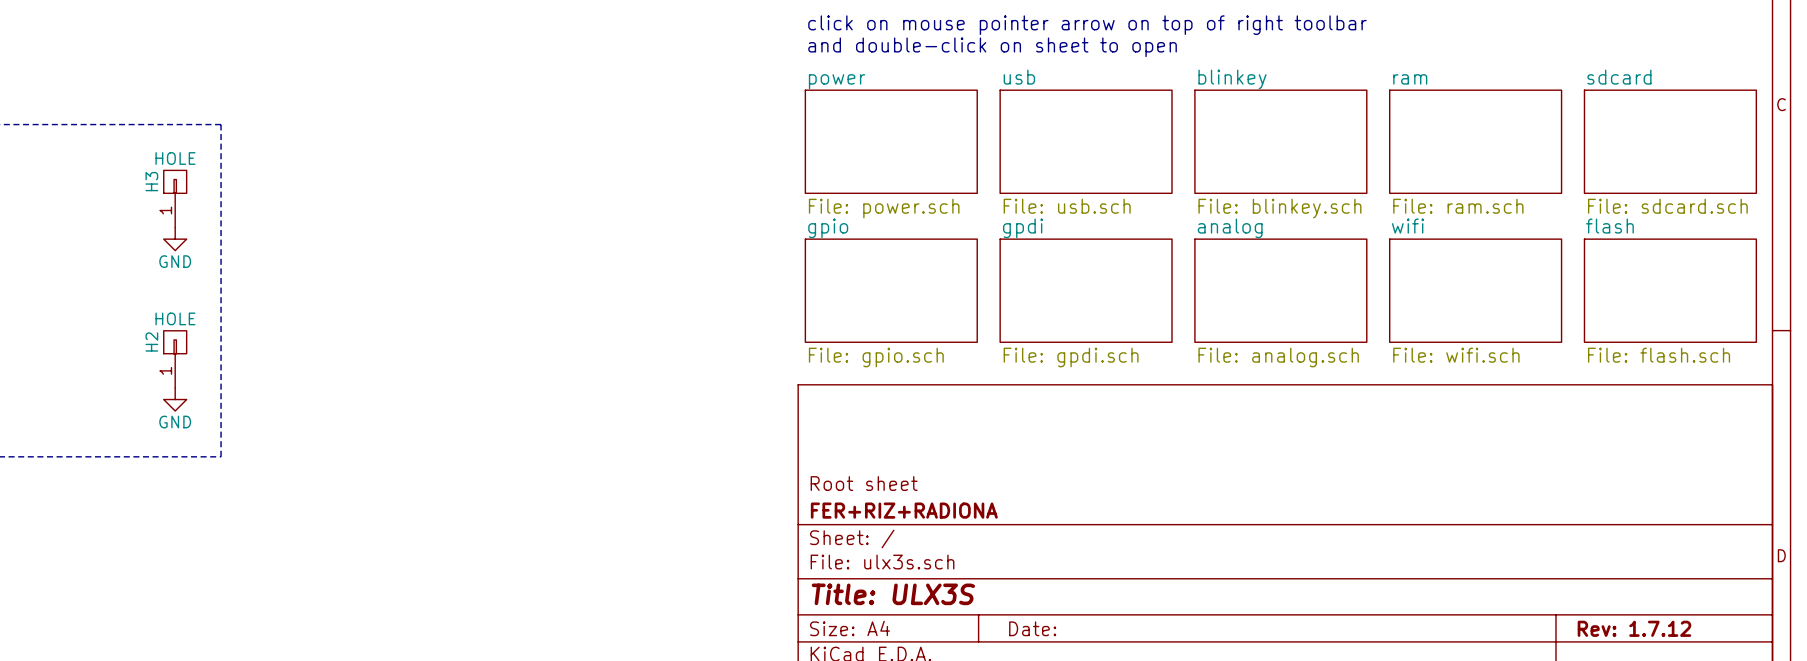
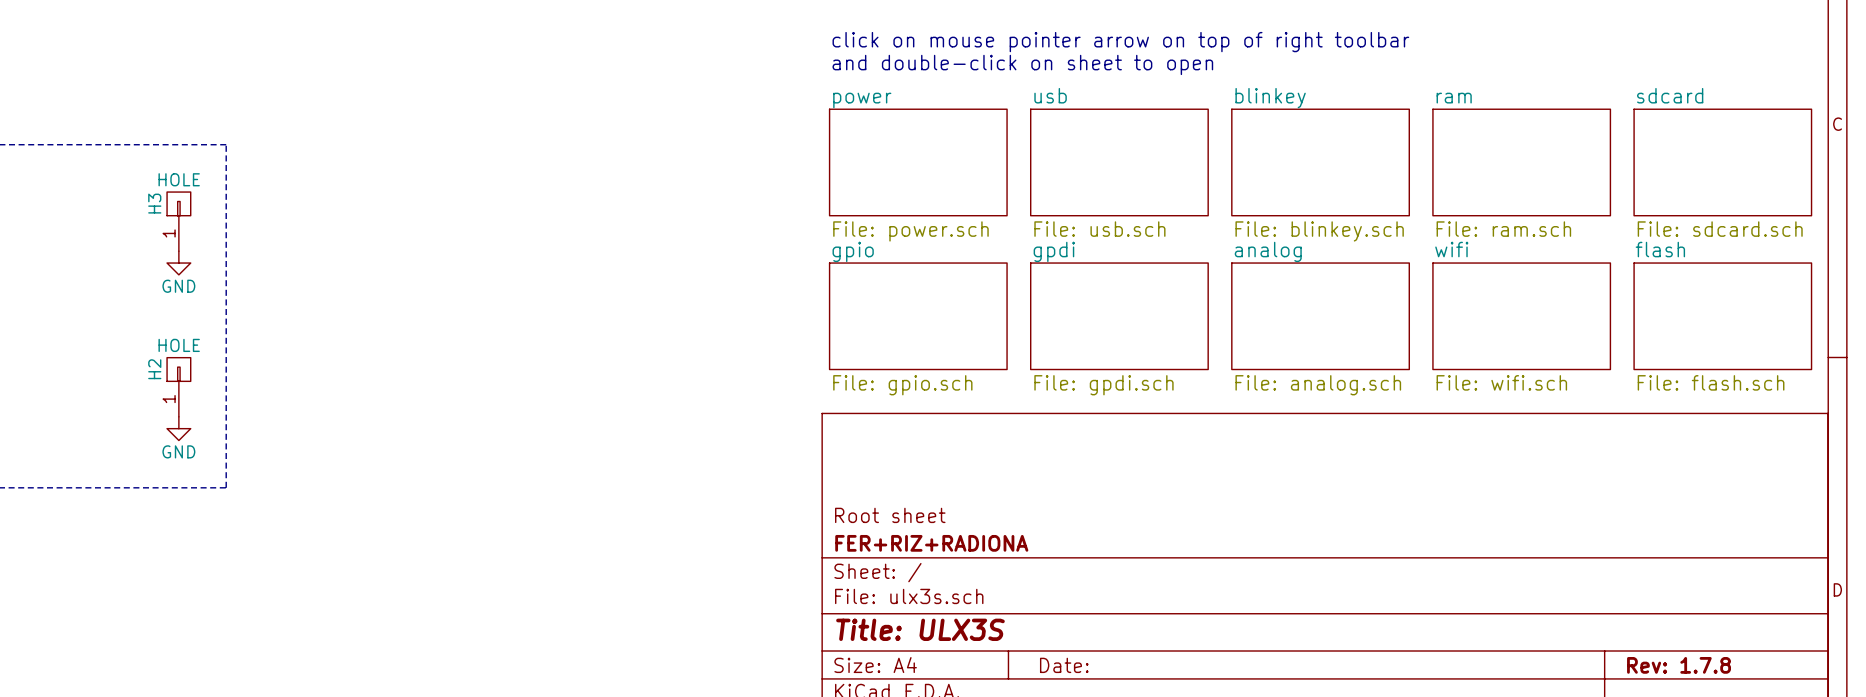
title block: Rev: 1.7.12 (1634, 628) -> Rev: 1.7.8 (1679, 665)

